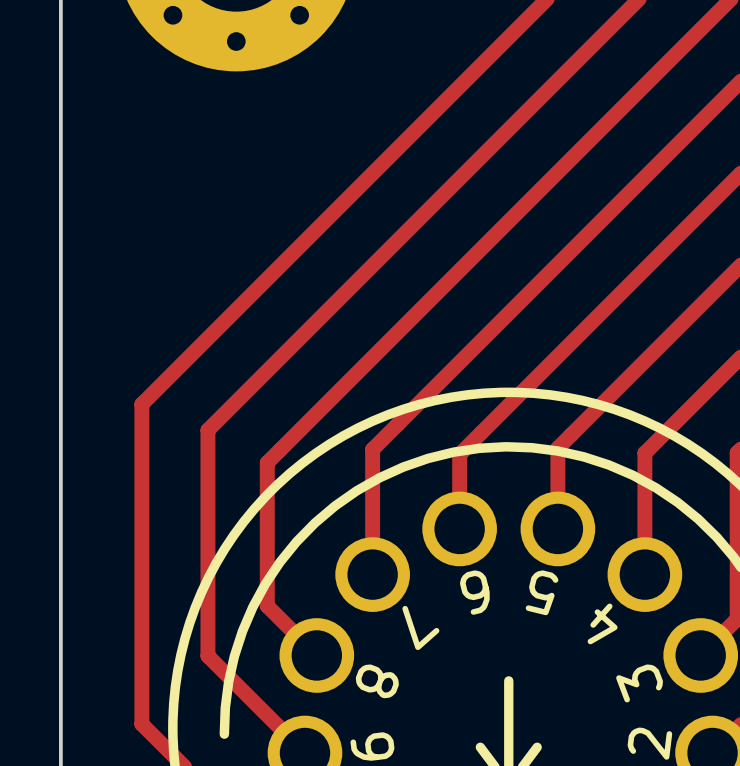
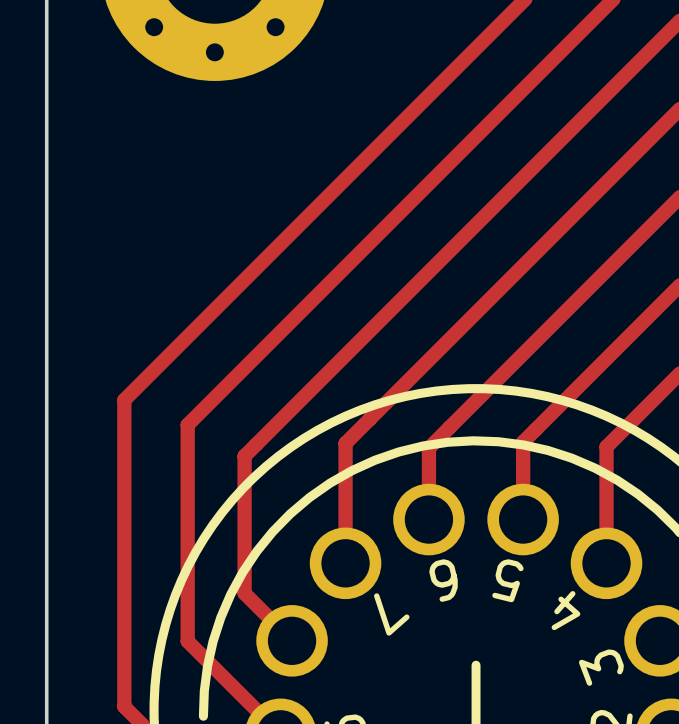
part text: 8 (377, 681) -> none

